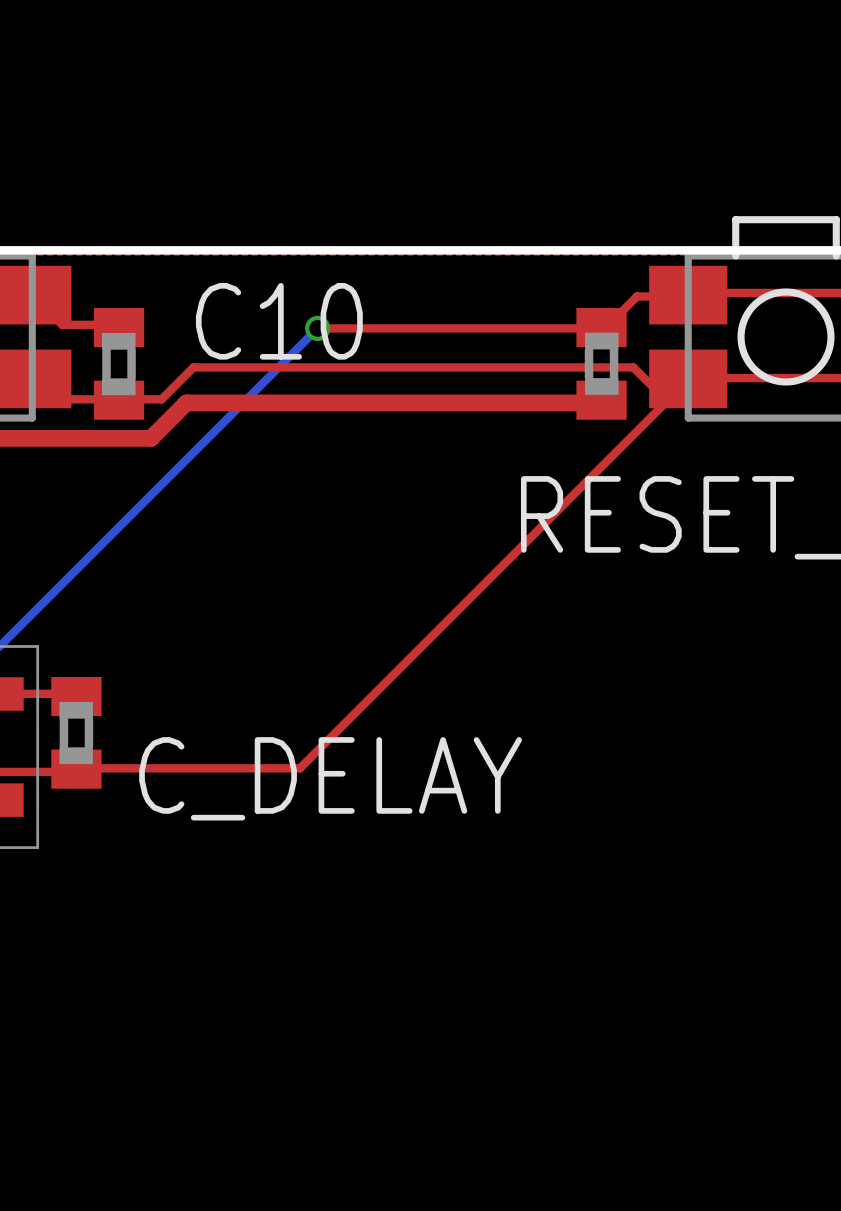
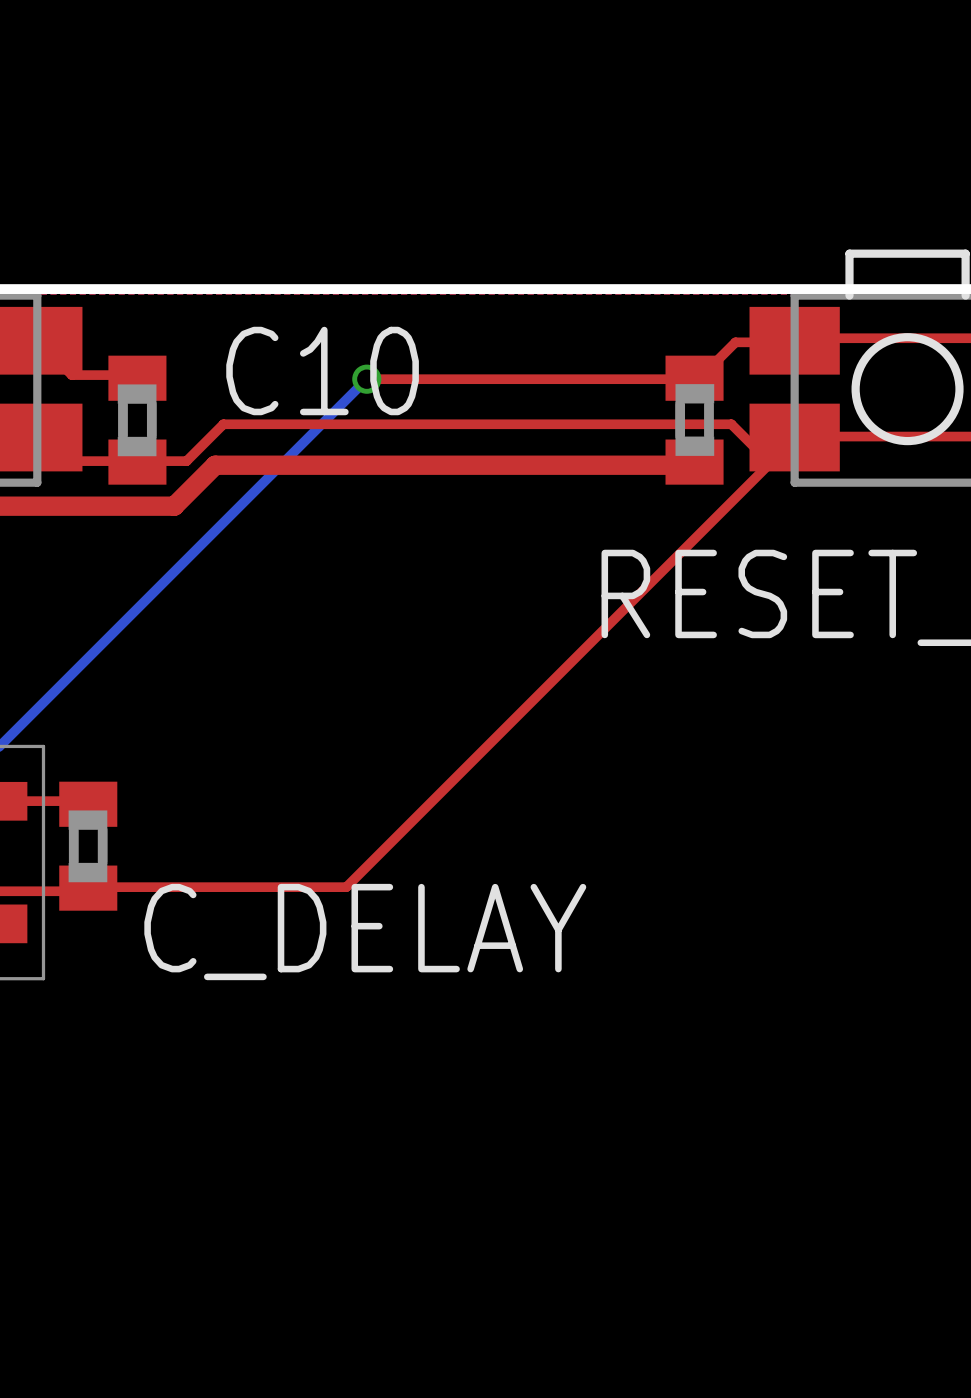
C_DELAY name position: C_DELAY (330, 778) -> C_DELAY (365, 932)

